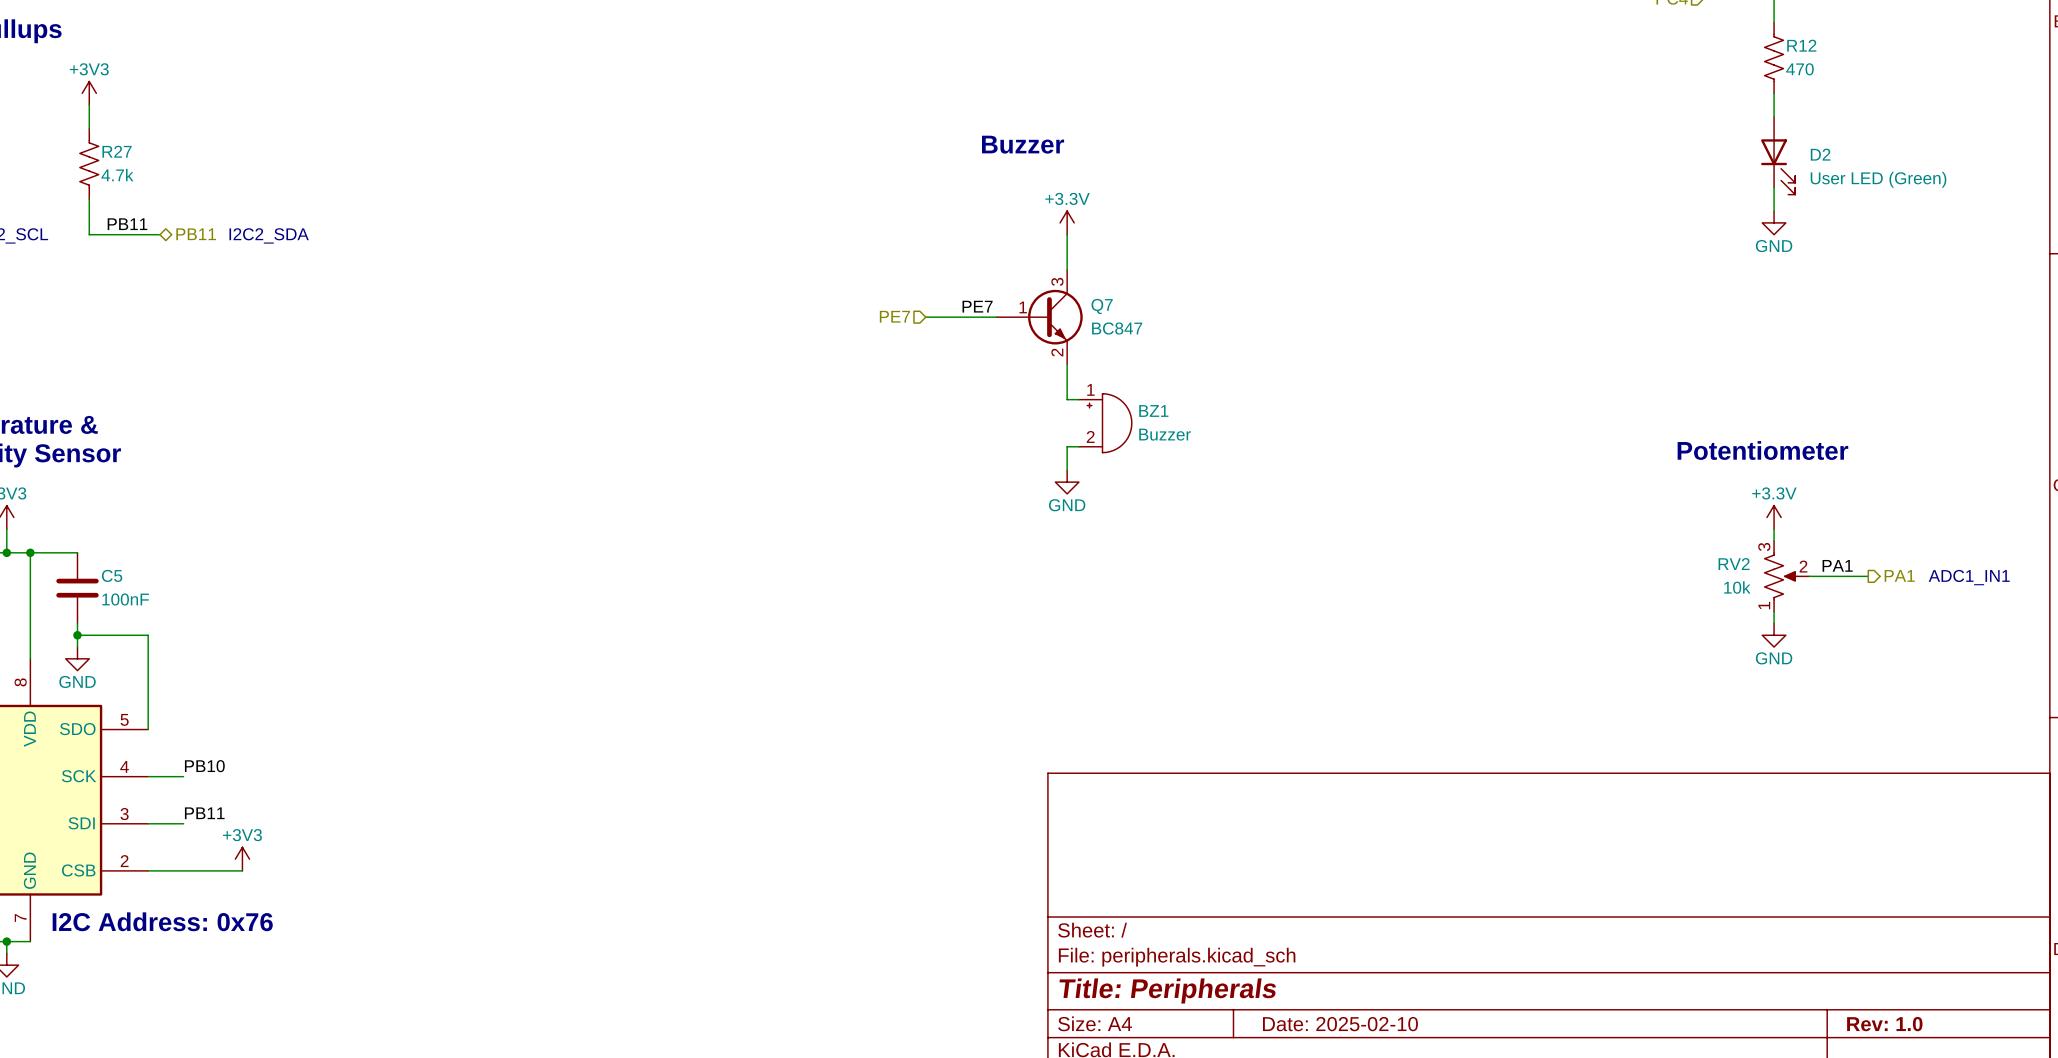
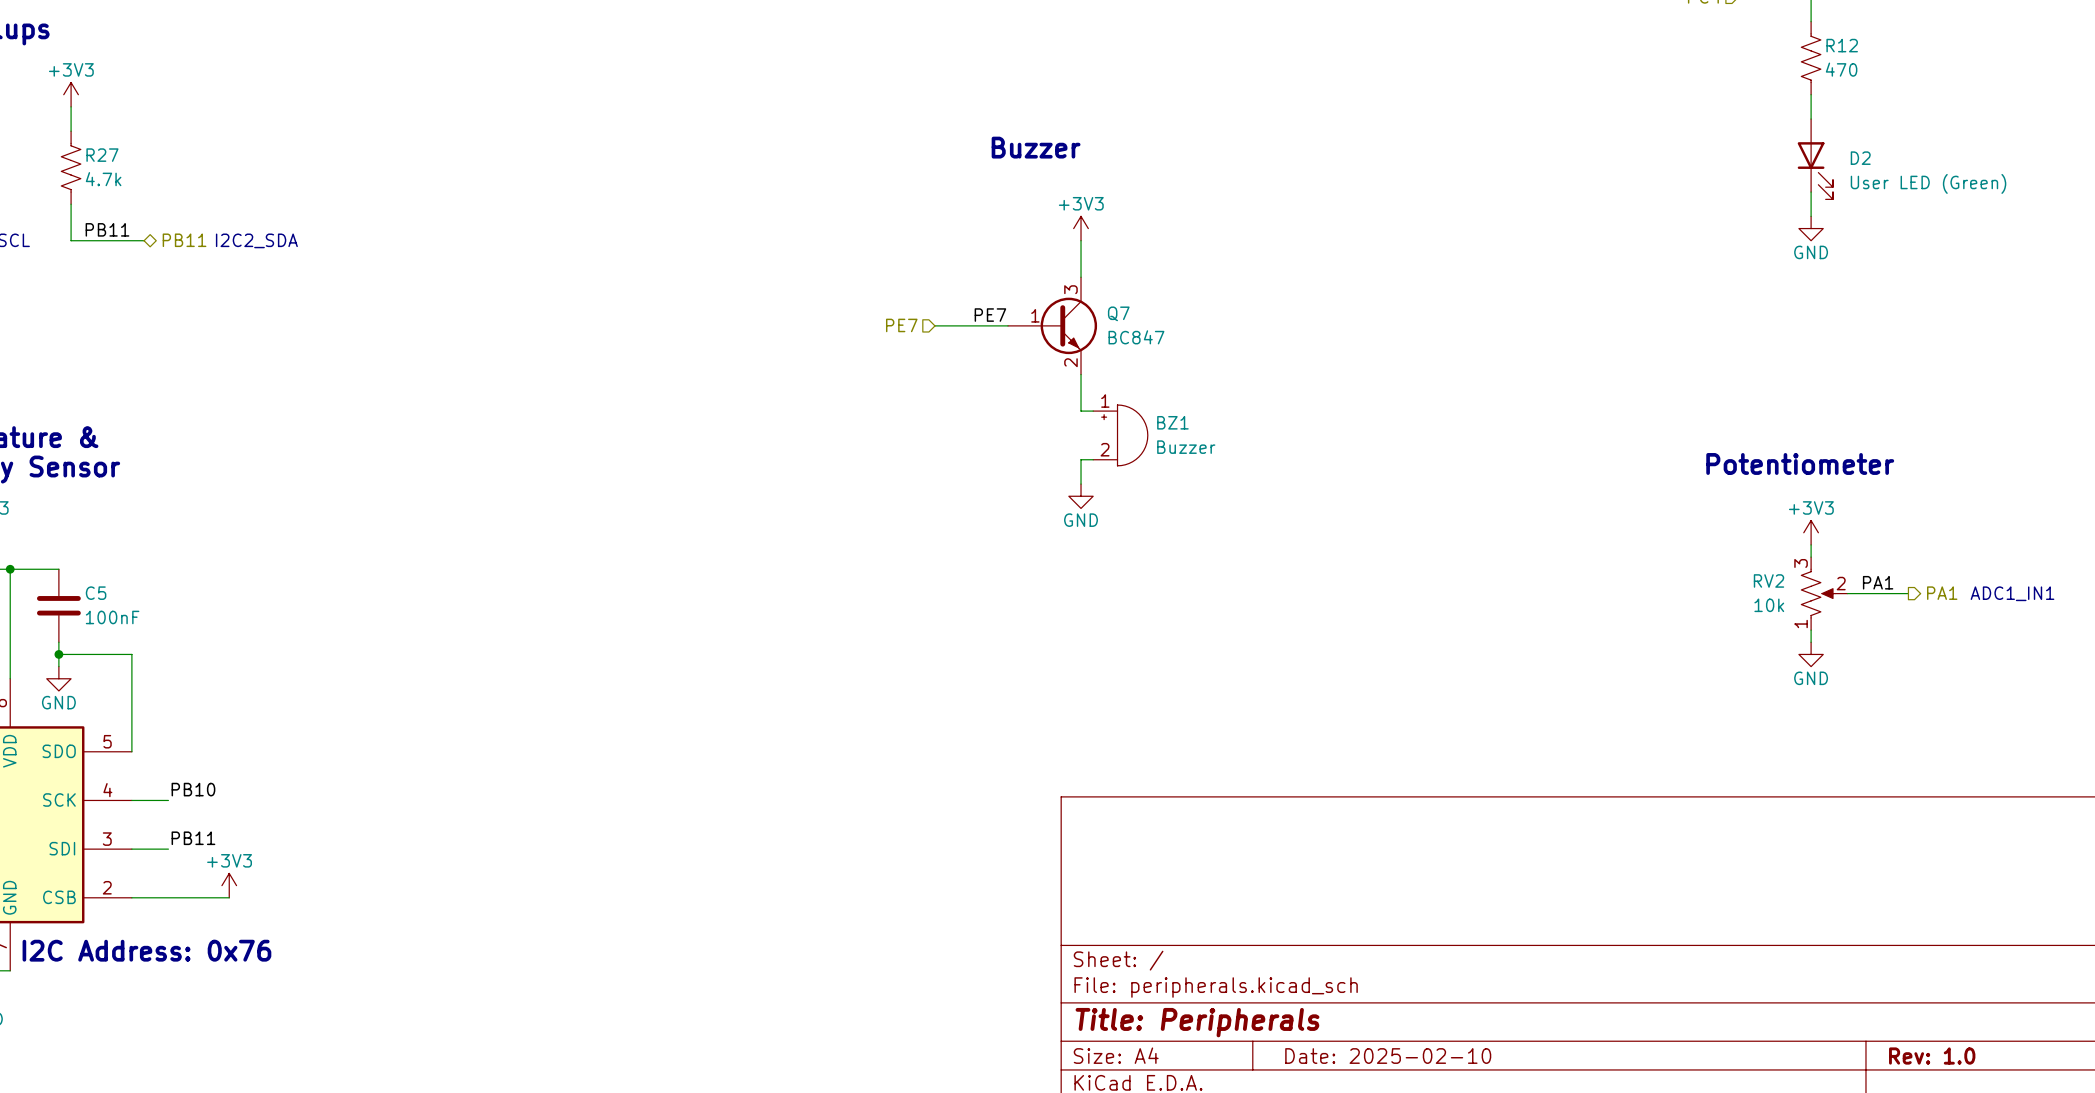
power symbol: +3.3V (1067, 222) -> +3V3 (1081, 228)
power symbol: +3.3V (1774, 517) -> +3V3 (1811, 532)

